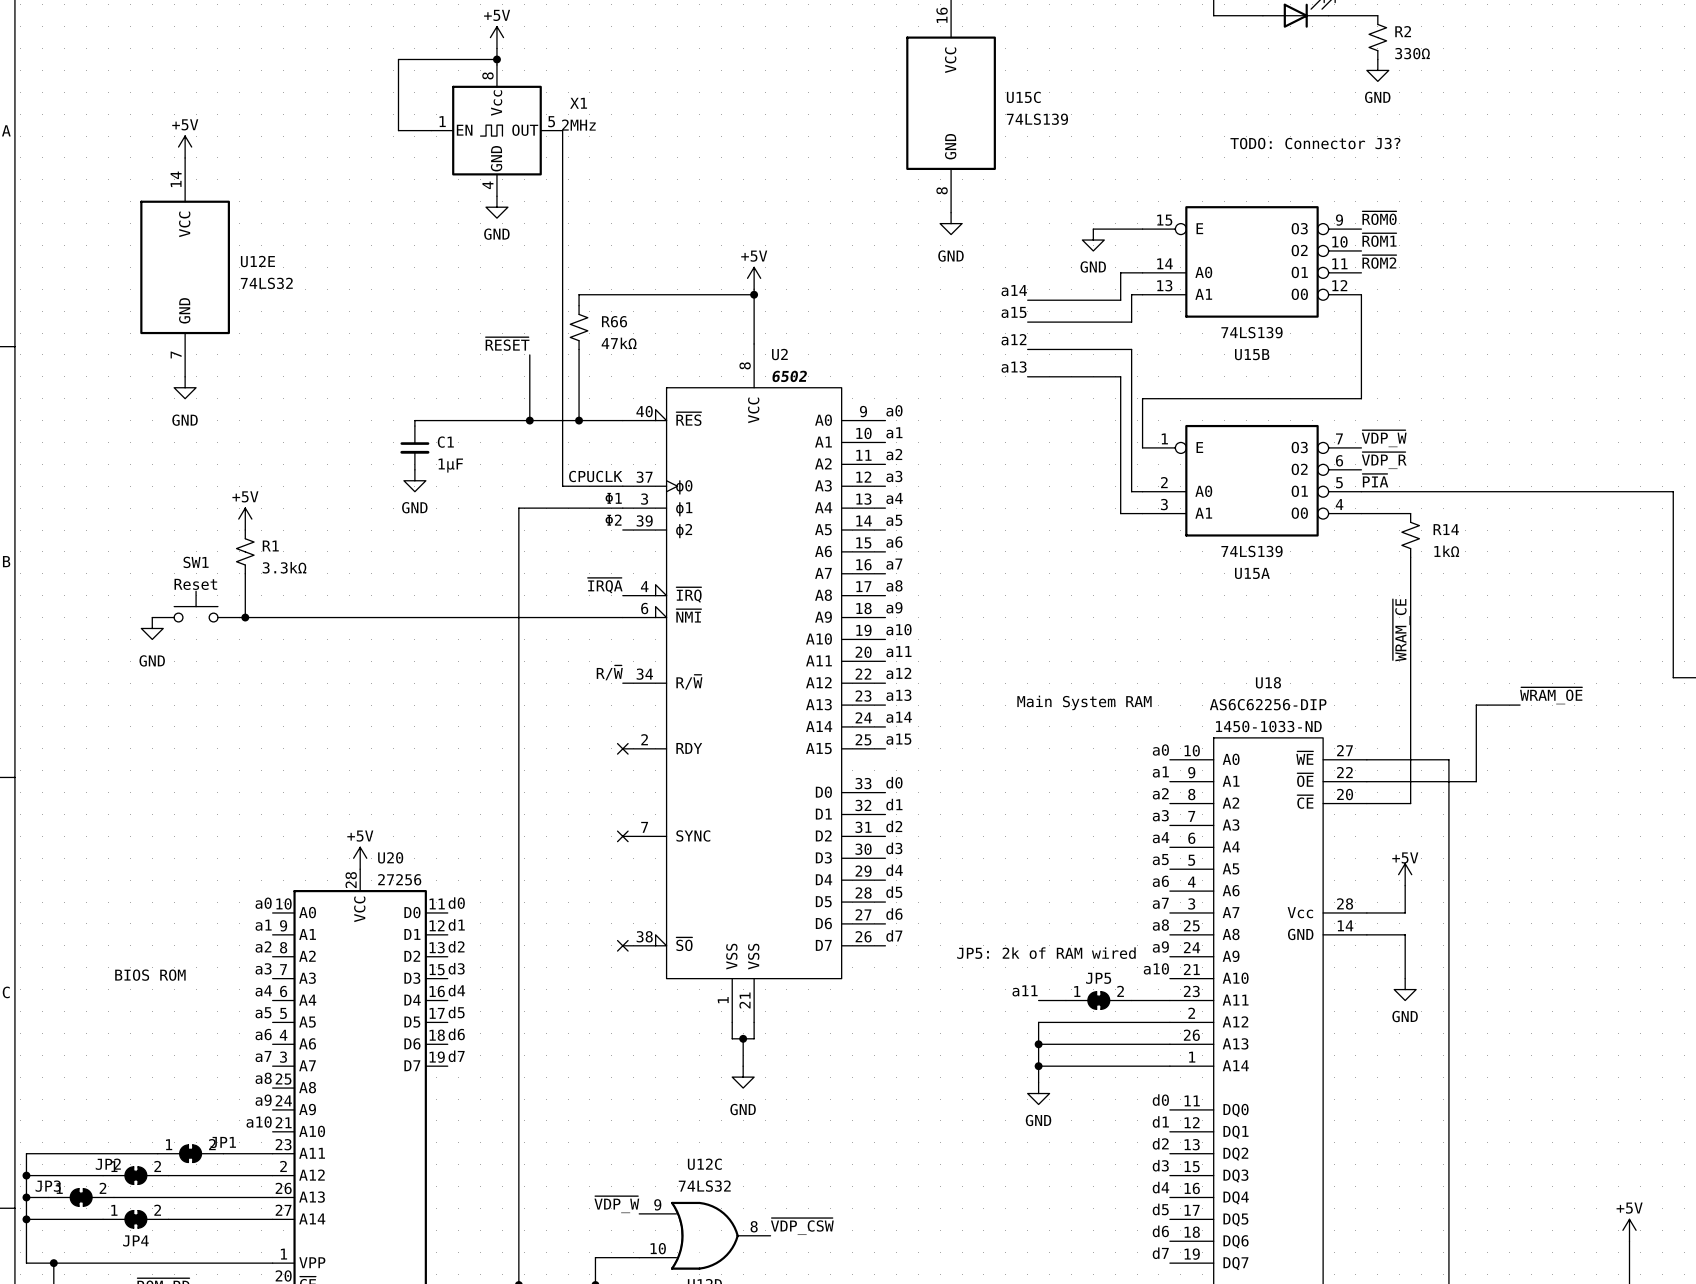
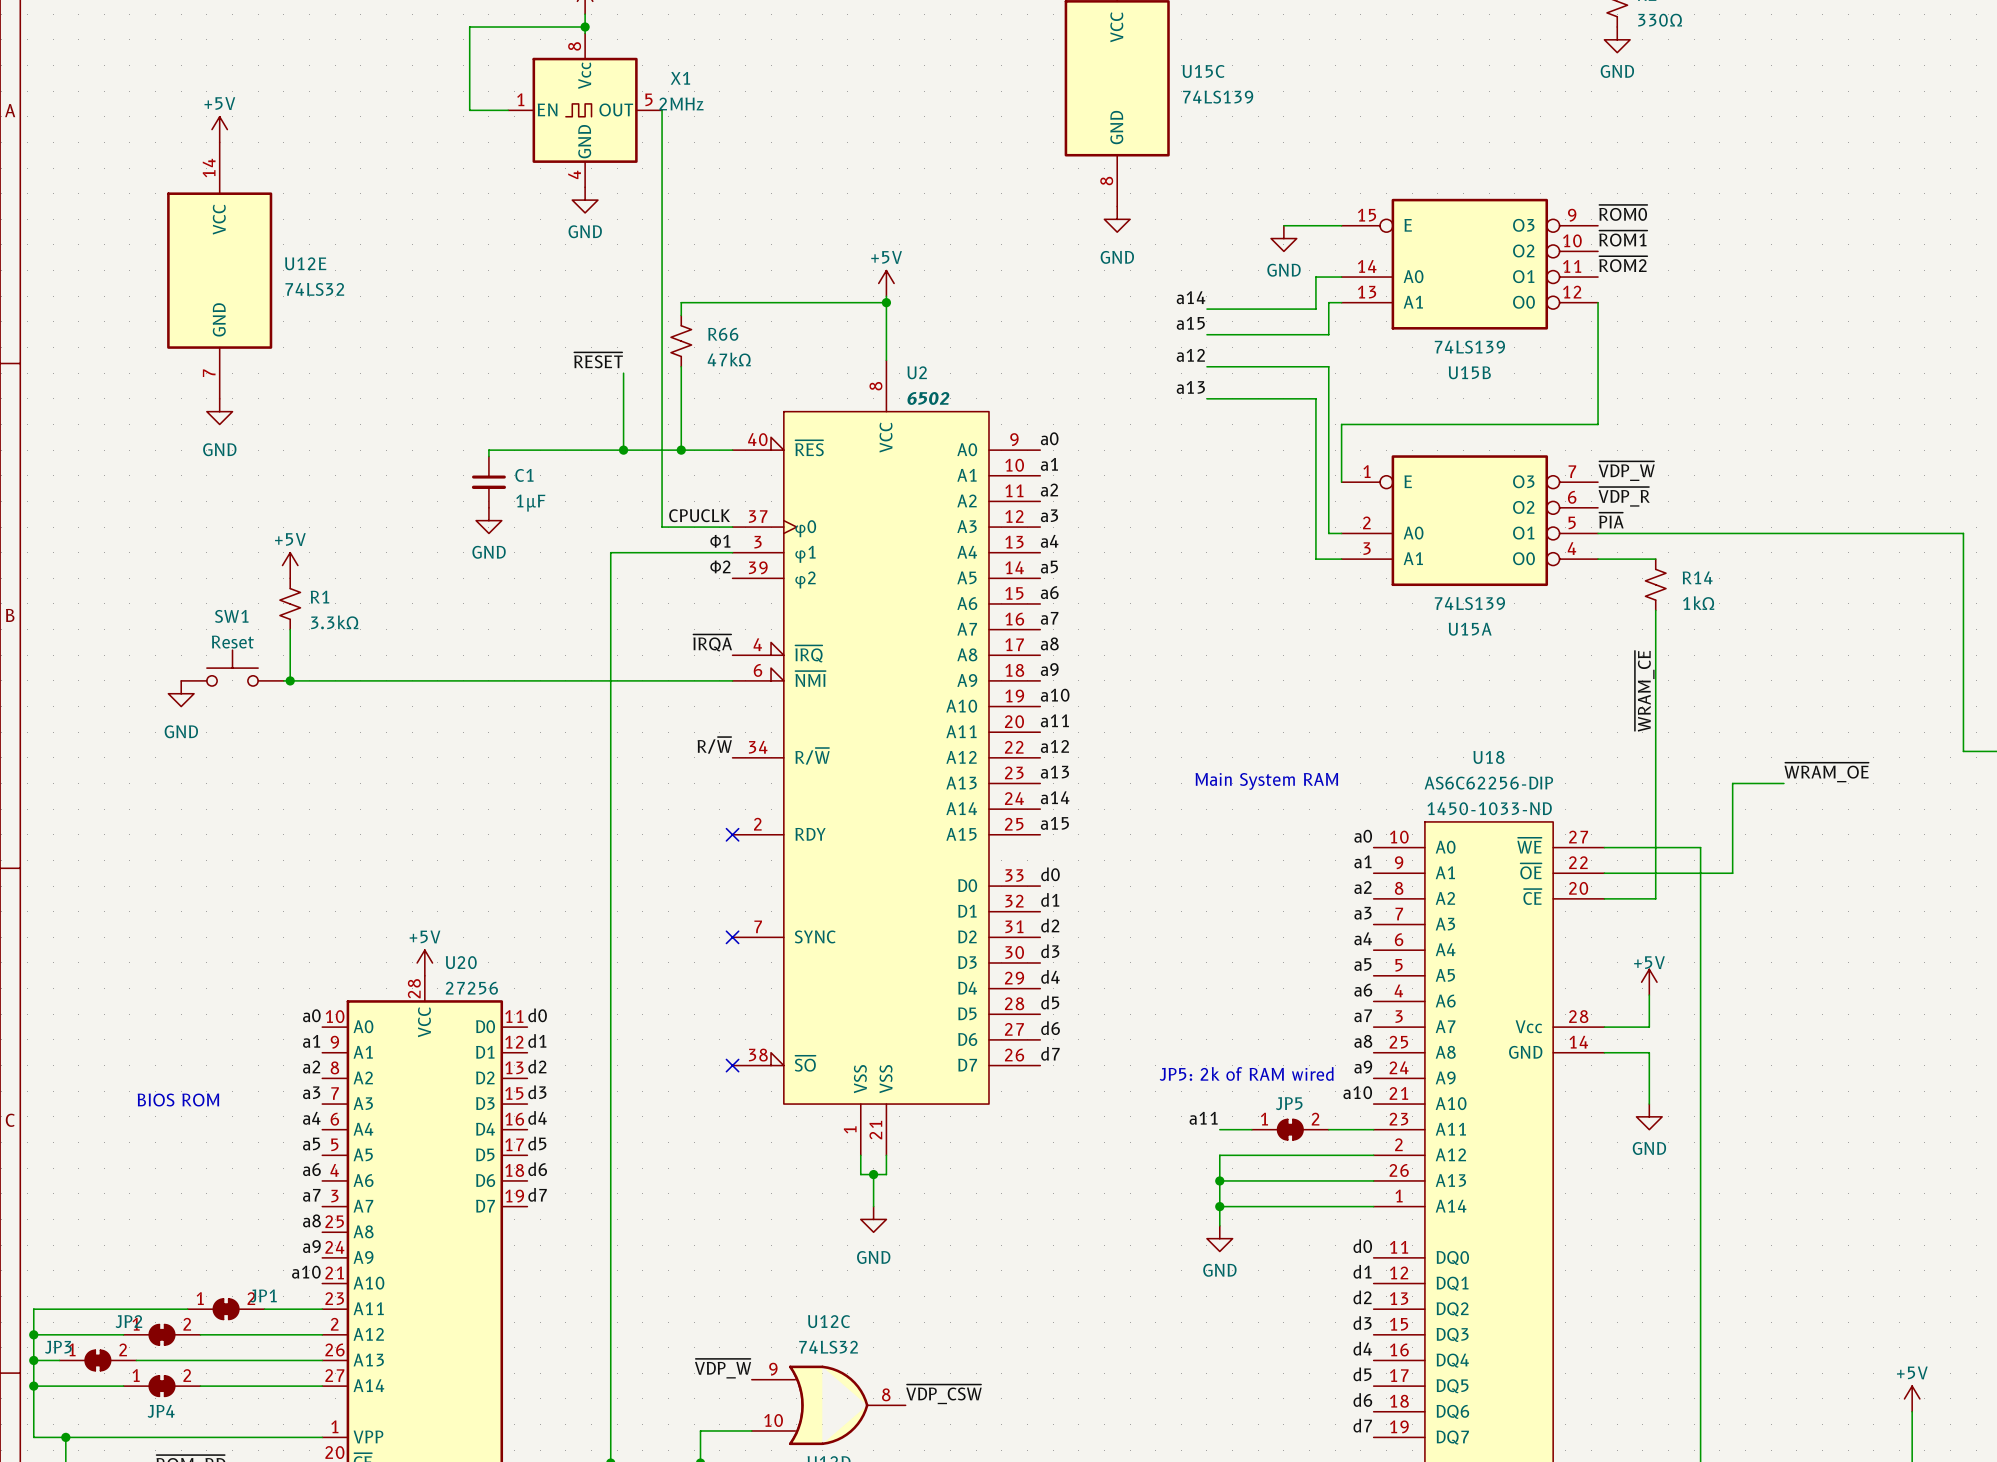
text: TODO: Connector J3? (1315, 143) -> none

